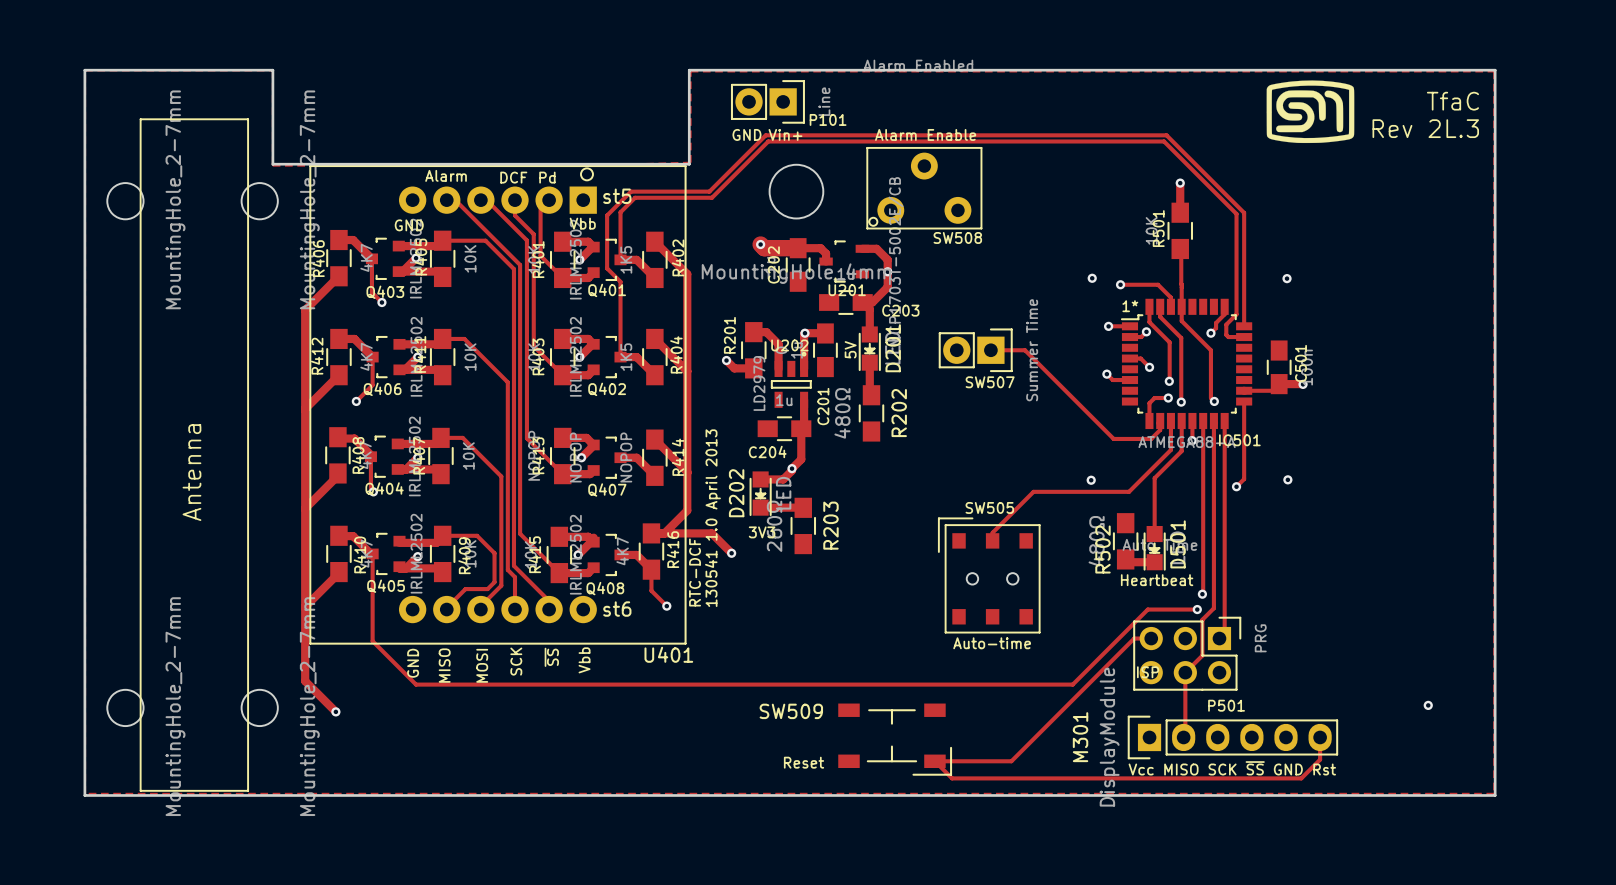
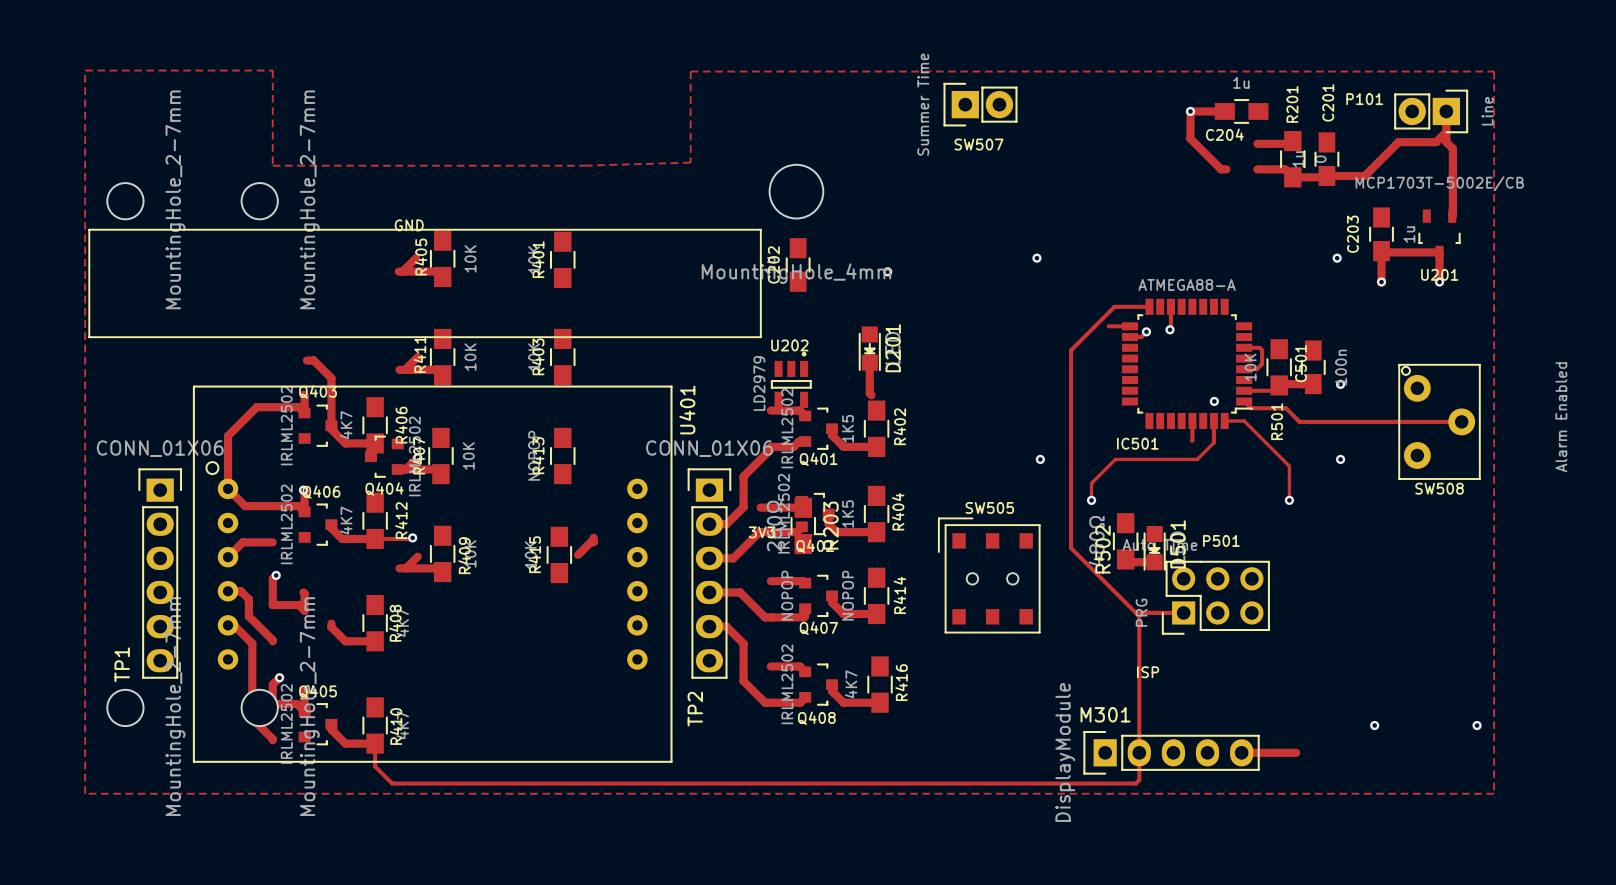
board edge: (84, 70) (272, 70) (272, 164) (689, 164) (689, 70) (1495, 70) (1495, 795) (84, 795) (84, 70) -> none
drawing: [1266, 80, 1355, 144] -> none
P101 position: (767, 101) -> (1431, 111)
text: TfaC (1452, 101) -> none
track: none -> (1224, 111) (1190, 111) (1190, 138) (1221, 169) (1226, 169)
track: none -> (1446, 111) (1446, 142) (1452, 148) (1452, 216)
line: (140, 119) (248, 119) (248, 790) (140, 790) (140, 119) -> none
P101 name position: P101 (828, 119) -> P101 (1364, 99)
text: Rev 2L.3 (1425, 128) -> none
track: none -> (1446, 131) (1436, 142) (1398, 142) (1364, 176) (1292, 177) (1284, 169) (1257, 169)
text: GND (746, 134) -> none
text: Vin+ (785, 134) -> none
text: Alarm Enable (925, 134) -> none
track: none -> (1292, 141) (1290, 143) (1257, 143)
U401 footprint: [309, 165, 687, 645] -> [192, 385, 673, 763]
text: Alarm (446, 175) -> none
text: DCF (513, 177) -> none
text: Pd (547, 177) -> none
track: (1180, 183) (1180, 212) -> none
via position: (1180, 183) -> (1190, 111)
SW508 rotation: 0° (924, 188) -> 90° clockwise (1439, 421)
SW508 position: (924, 188) -> (1439, 421)
track: (446, 200) (455, 200) (520, 264) (520, 533) (559, 573) (588, 573) (593, 567) -> none
track: (480, 200) (486, 200) (526, 240) (526, 438) (562, 474) (590, 474) (593, 470) -> none
track: (514, 200) (514, 215) (533, 234) (533, 346) (562, 375) (588, 375) (593, 369) -> none
track: (549, 200) (540, 206) (540, 255) (562, 277) (588, 277) (593, 272) -> none
text: Vbb (582, 223) -> none
R501 name position: R501 (1158, 228) -> R501 (1277, 421)
line: none -> (89, 229) (760, 229) (760, 337) (89, 337) (89, 229)
R501 position: (1180, 230) -> (1279, 367)
SW508 name position: SW508 (957, 237) -> SW508 (1439, 488)
track: (338, 240) (353, 240) (371, 258) (371, 292) (381, 302) -> none
track: (562, 241) (588, 241) (593, 247) (579, 259) -> none
track: (654, 241) (687, 274) (687, 510) (664, 533) -> none
track: (760, 244) (764, 248) (820, 248) (826, 253) (826, 261) -> none
via: (760, 244) -> none
track: (398, 246) (437, 246) (442, 240) (485, 240) (513, 269) (513, 565) (549, 601) (549, 609) -> none
track: (862, 248) (876, 248) (887, 259) (887, 287) (872, 302) (862, 302) -> none
track: (1180, 256) (1180, 248) (1181, 321) (1210, 350) (1210, 398) (1214, 401) -> none
R406 value position: 4K7 (366, 257) -> 4K7 (346, 425)
R406 name position: R406 (318, 258) -> R406 (401, 425)
R406 position: (338, 258) -> (375, 425)
Q403 rotation: 0° (385, 258) -> 180° (318, 425)
Q403 position: (385, 258) -> (318, 425)
via: (416, 258) -> none
via: none -> (1036, 258)
via: none -> (1337, 258)
via: (579, 259) -> none
Q401 position: (607, 259) -> (818, 428)
R402 position: (654, 259) -> (876, 428)
U201 rotation: 0° (844, 261) -> 90° counterclockwise (1439, 234)
U201 position: (844, 261) -> (1439, 234)
track: (338, 276) (305, 310) (305, 681) (335, 711) -> none
track: (654, 277) (636, 259) (620, 259) (620, 212) (635, 197) (711, 197) (768, 141) (1164, 141) (1236, 213) (1236, 314) (1226, 324) (1226, 334) (1228, 337) (1244, 337) -> none
via: (1092, 278) -> none
via: (1287, 278) -> none
track: none -> (1381, 282) (1381, 251) (1439, 252) (1439, 282)
via: none -> (1381, 282)
via: none -> (1439, 282)
track: (1120, 284) (1158, 284) (1170, 297) (1170, 306) -> (1170, 329) (1170, 306)
via: (1120, 284) -> none
via: (381, 302) -> none
C203 rotation: 0° (845, 302) -> 90° clockwise (1381, 234)
C203 position: (845, 302) -> (1381, 234)
track: (862, 302) (869, 309) (869, 334) -> none
text: 1* (1130, 306) -> none
track: (1149, 306) (1149, 322) (1169, 342) (1169, 381) -> (1149, 306) (1114, 306) (1071, 350) (1071, 548) (1135, 612) (1183, 612)
track: (1160, 306) (1160, 316) (1181, 337) (1181, 402) -> none
track: (1224, 306) (1224, 314) (1216, 322) (1216, 328) (1210, 333) -> none
C203 name position: C203 (900, 310) -> C203 (1352, 234)
via: (1108, 326) -> none
track: (1244, 326) (1244, 212) (1166, 135) (765, 135) (709, 191) (630, 191) (607, 215) (607, 268) (620, 281) (620, 357) (636, 357) (654, 375) -> none
via: none -> (1170, 329)
track: (753, 332) (766, 332) (778, 344) (778, 368) -> none
via: (804, 333) -> none
track: (825, 333) (804, 334) (804, 368) -> none
via: (1210, 333) -> none
R201 name position: R201 (729, 335) -> R201 (1292, 104)
track: (338, 338) (354, 338) (372, 357) (372, 385) (356, 401) -> none
track: (562, 338) (588, 338) (593, 344) (579, 357) -> none
track: (654, 338) (687, 371) -> none
track: (399, 344) (437, 344) (442, 338) (464, 338) (507, 382) (507, 569) (514, 577) (514, 609) -> none
track: none -> (1244, 347) (1259, 347) (1262, 350) (1262, 363) (1256, 369) (1244, 369)
text: 5V (850, 349) -> none
R201 position: (753, 350) -> (1292, 159)
C201 position: (825, 350) -> (1326, 159)
SW507 rotation: 0° (975, 350) -> 180° (980, 104)
SW507 position: (975, 350) -> (980, 104)
track: (990, 350) (1025, 350) (1113, 438) (1151, 438) (1160, 430) (1160, 420) -> none
R412 name position: R412 (317, 356) -> R412 (401, 520)
R412 value position: 4K7 (366, 356) -> 4K7 (346, 520)
R412 position: (338, 357) -> (375, 520)
Q406 rotation: 0° (386, 357) -> 180° (318, 524)
Q406 position: (386, 357) -> (318, 524)
via: (417, 357) -> none
via: (579, 357) -> none
Q402 position: (607, 357) -> (815, 514)
R404 position: (654, 357) -> (876, 514)
track: (1129, 358) (1140, 358) (1149, 367) -> none
track: none -> (306, 360) (313, 360) (331, 378) (331, 429) (345, 443) (375, 443)
track: (726, 360) (734, 368) (753, 368) -> none
via: (726, 360) -> none
IC501 rotation: 0° (1186, 363) -> 180° (1187, 363)
via: (1149, 367) -> none
C501 position: (1279, 367) -> (1313, 367)
track: (1106, 374) (1112, 380) (1129, 380) -> none
via: (1106, 374) -> none
track: (338, 375) (305, 408) -> none
via: (1169, 381) -> none
via position: (1303, 384) -> (1340, 384)
track: none -> (303, 394) (304, 412) (298, 407) (256, 407) (228, 435) (228, 488) (245, 506) (298, 506) (304, 511) (303, 490)
track: (1168, 398) (1154, 398) (1149, 403) (1149, 420) -> none
via: (1168, 398) -> none
track: (804, 399) (801, 459) (783, 479) (760, 479) -> none
via: (356, 401) -> none
track: (1244, 401) (1244, 479) (1236, 486) -> (1244, 401) (1250, 408) (1286, 408) (1299, 421) (1461, 421)
via: (1181, 402) -> none
C201 name position: C201 (823, 406) -> C201 (1328, 102)
R202: 480Ω (871, 413) -> none
track: (1170, 420) (1170, 449) (1129, 491) (1033, 491) (992, 532) (992, 540) -> none
track: (1181, 420) (1181, 451) (1154, 478) (1154, 534) -> none
track: (1203, 420) (1202, 594) -> none
track: (1224, 420) (1224, 633) (1219, 638) -> (1224, 420) (1244, 420) (1289, 466) (1289, 500)
C204 position: (784, 428) -> (1241, 111)
track: none -> (832, 428) (832, 435) (843, 446) (876, 446)
track: (440, 437) (462, 437) (501, 476) (501, 585) (480, 606) (480, 609) (478, 607) -> none
track: (562, 437) (586, 437) (593, 444) (581, 457) -> none
track: (338, 438) (354, 438) (372, 456) -> none
track: (442, 438) (437, 443) (399, 443) -> none
track: (654, 439) (687, 472) -> none
via: (1192, 440) -> none
IC501 name position: IC501 (1239, 440) -> IC501 (1137, 443)
track: none -> (805, 441) (799, 441) (793, 446) (770, 446) (770, 449) (743, 476) (743, 507) (726, 524) (709, 524)
track: (1213, 442) (1213, 608) (1202, 619) (1202, 655) (1185, 672) -> (1213, 442) (1197, 459) (1115, 459) (1091, 483) (1091, 500)
R408 position: (337, 455) -> (375, 623)
track: (370, 456) (370, 489) (373, 491) -> none
via: (581, 457) -> none
Q407 position: (607, 457) -> (818, 595)
track: (620, 457) (636, 457) (654, 475) -> none
R414 position: (654, 457) -> (876, 595)
via: none -> (1040, 459)
via: none -> (1340, 459)
via: (792, 468) -> none
text: Antenna (191, 472) -> none
track: (338, 474) (305, 508) -> none
via position: (1287, 479) -> (1289, 500)
via position: (1091, 480) -> (1091, 500)
via: (1236, 486) -> none
via: none -> (303, 490)
via: (373, 491) -> none
D202: LED (760, 493) -> none
track: none -> (828, 514) (828, 524) (836, 532) (876, 532)
text: 130541 1.0 April 2013 (712, 518) -> none
track: none -> (331, 524) (331, 528) (342, 538) (412, 537)
track: none -> (801, 526) (797, 532) (759, 532) (733, 558) (709, 558)
track: (651, 533) (711, 533) (731, 553) -> none
track: (442, 535) (477, 535) (494, 553) (494, 582) (487, 589) (465, 589) (446, 609) -> none
track: (339, 536) (353, 536) (372, 555) -> none
track: (442, 536) (436, 542) (399, 542) -> none
track: (559, 536) (588, 536) (593, 542) -> (770, 410) (799, 410) (805, 415)
track: none -> (272, 542) (242, 542) (228, 557)
R416 position: (651, 551) -> (880, 684)
R410 position: (338, 553) -> (375, 725)
track: (372, 553) (372, 641) (416, 684) (1072, 684) (1147, 609) (1197, 609) -> none
Q405 rotation: 0° (386, 553) -> 180° (318, 724)
Q405 position: (386, 553) -> (318, 724)
via: (731, 553) -> none
via: (578, 554) -> none
Q408 position: (607, 554) -> (818, 684)
track: (620, 554) (636, 554) (651, 569) (651, 590) (666, 606) -> none
via position: (417, 556) -> (412, 537)
track: (339, 572) (305, 606) -> none
text: RTC-DCF (695, 572) -> none
TP1: none -> CONN_01X06 (160, 573)
TP2: none -> CONN_01X06 (709, 573)
track: none -> (276, 575) (272, 578) (272, 605) (298, 605) (304, 610) (303, 592)
via: none -> (276, 575)
text: Heartbeat (1157, 580) -> none
track: none -> (770, 581) (803, 581) (805, 583)
track: none -> (228, 591) (240, 591) (248, 599) (248, 616) (272, 641)
track: none -> (709, 592) (740, 592) (765, 617) (803, 617) (805, 608)
via: (1202, 594) -> none
track: none -> (832, 595) (832, 602) (843, 614) (876, 614)
via: (666, 606) -> none
via: (1197, 609) -> none
track: none -> (1139, 612) (1139, 780) (1135, 783) (392, 783) (375, 766) (375, 743) (345, 743) (331, 729) (331, 724)
track: none -> (331, 623) (331, 627) (345, 641) (375, 641)
track: none -> (228, 625) (234, 625) (252, 643) (252, 718) (272, 740)
track: none -> (709, 626) (726, 626) (743, 643) (743, 681) (765, 702) (800, 702) (805, 697)
track: (1151, 638) (1134, 638) (1011, 761) (934, 761) (952, 778) (1301, 778) (1320, 759) (1320, 737) -> none
text: Auto-time (992, 643) -> none
P501 rotation: 0° (1187, 653) -> 180° (1215, 597)
U401 name position: U401 (668, 654) -> U401 (687, 410)
text: ~{SS} (551, 657) -> none
text: Vbb (584, 660) -> none
text: SCK (516, 661) -> none
text: GND (413, 663) -> none
text: MISO (444, 665) -> none
text: MOSI (482, 665) -> none
track: none -> (770, 666) (799, 666) (805, 671)
track: (1185, 669) (1185, 735) (1183, 737) -> none
track: none -> (279, 677) (272, 684) (272, 703) (297, 703) (304, 711) (303, 691)
track: none -> (832, 684) (832, 691) (843, 702) (880, 702)
P501 name position: P501 (1226, 705) -> P501 (1221, 540)
via: (1428, 705) -> none
via position: (335, 711) -> (279, 677)
M301 footprint: [1127, 715, 1339, 760] -> [1083, 730, 1260, 775]
via: none -> (1374, 725)
via: none -> (1477, 725)
M301 name position: M301 (1080, 737) -> M301 (1105, 714)
SW509: (895, 739) -> none
track: none -> (1241, 752) (1296, 752)
text: Reset (804, 762) -> none
text: Vcc MISO SCK ~{SS} GND Rst (1232, 768) -> none

